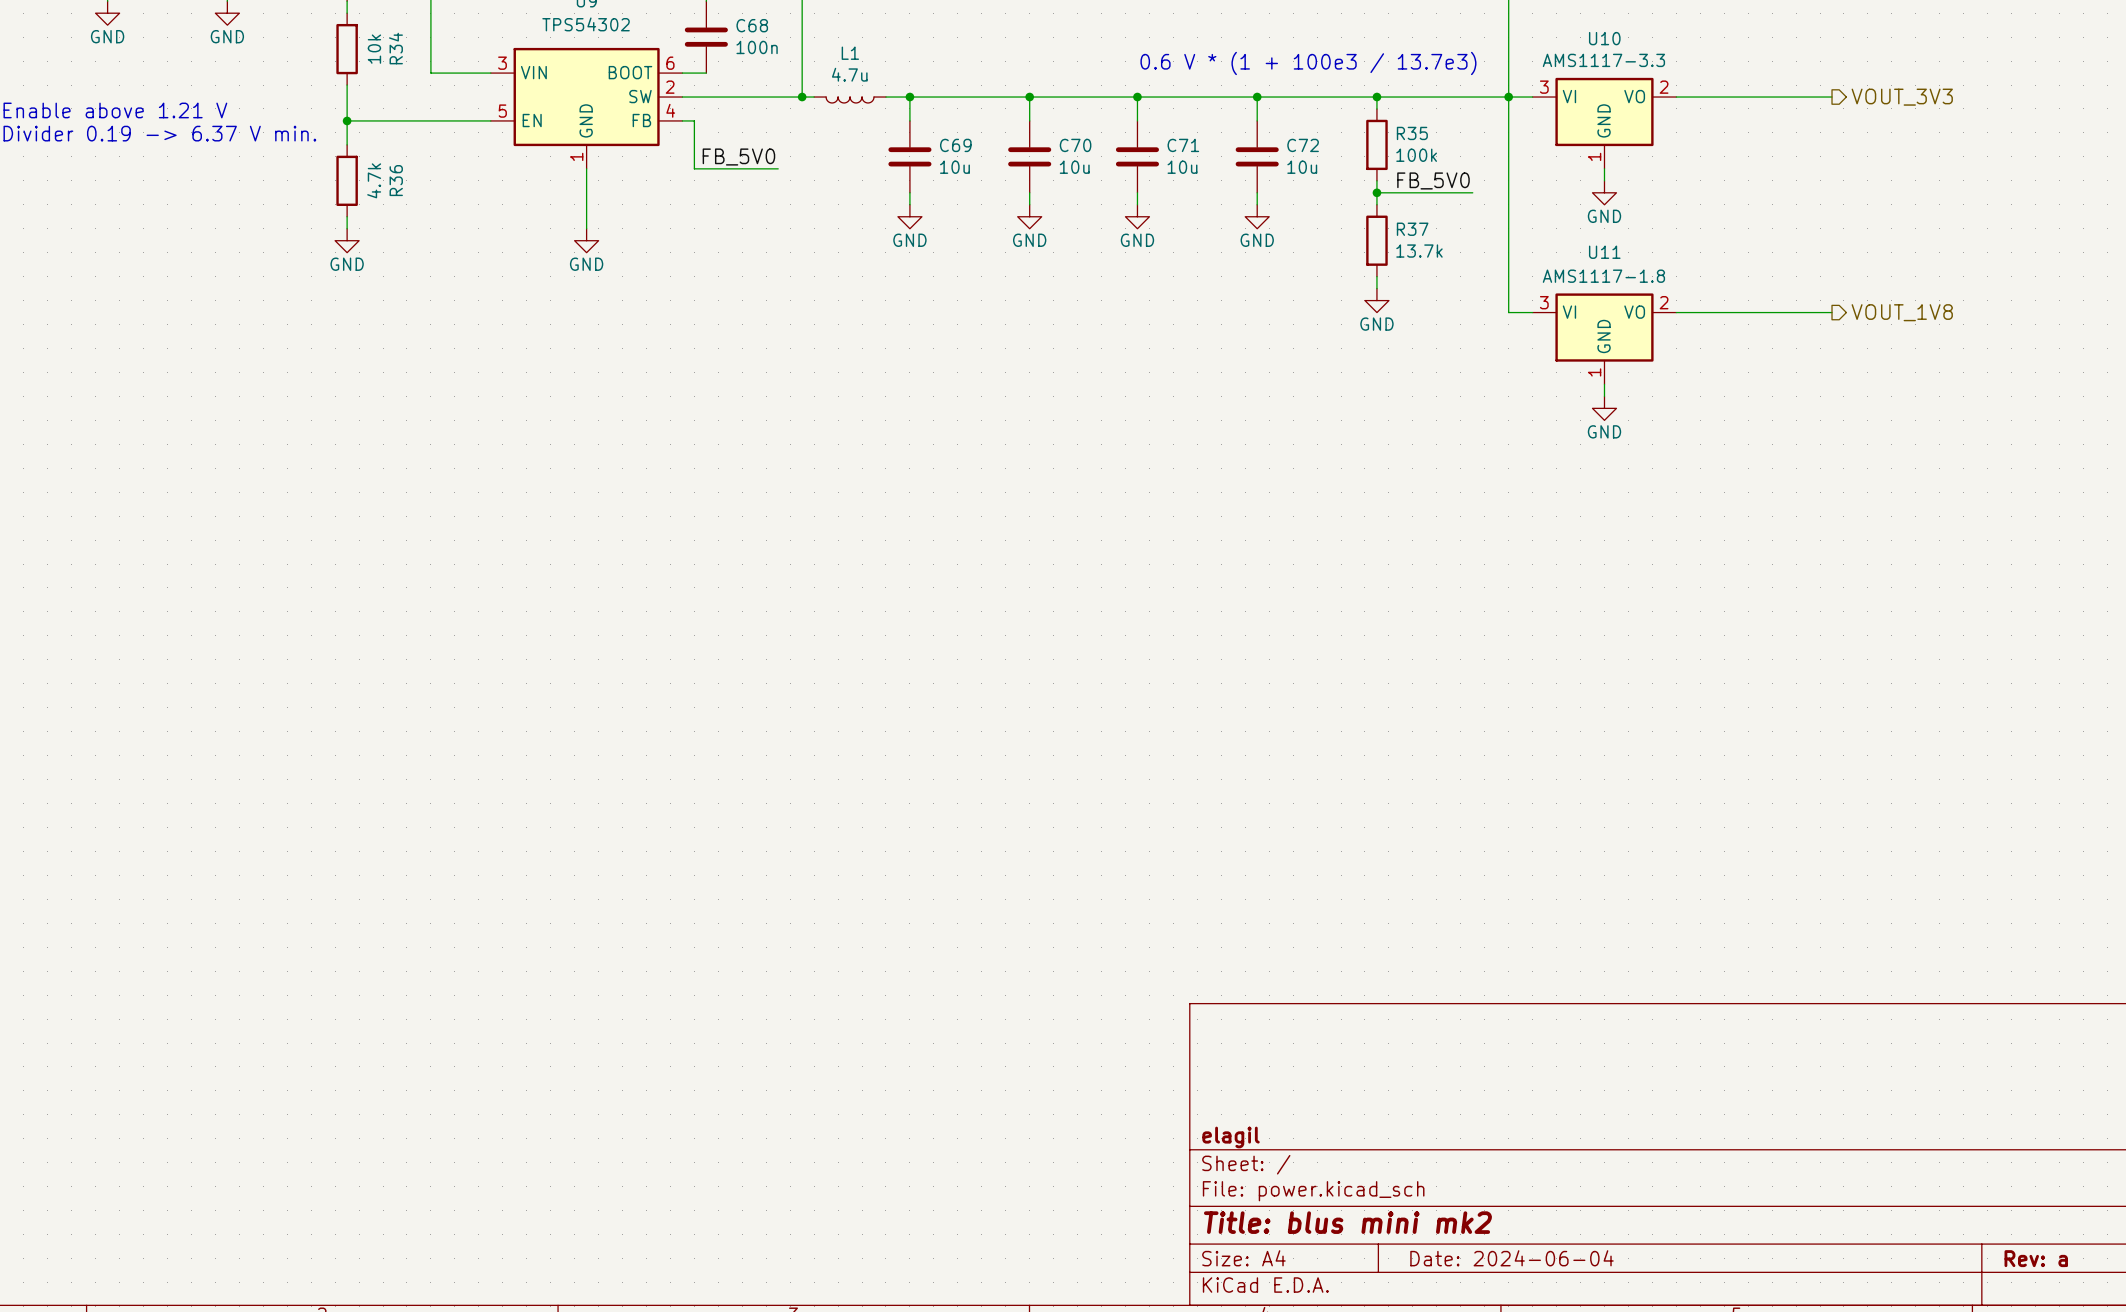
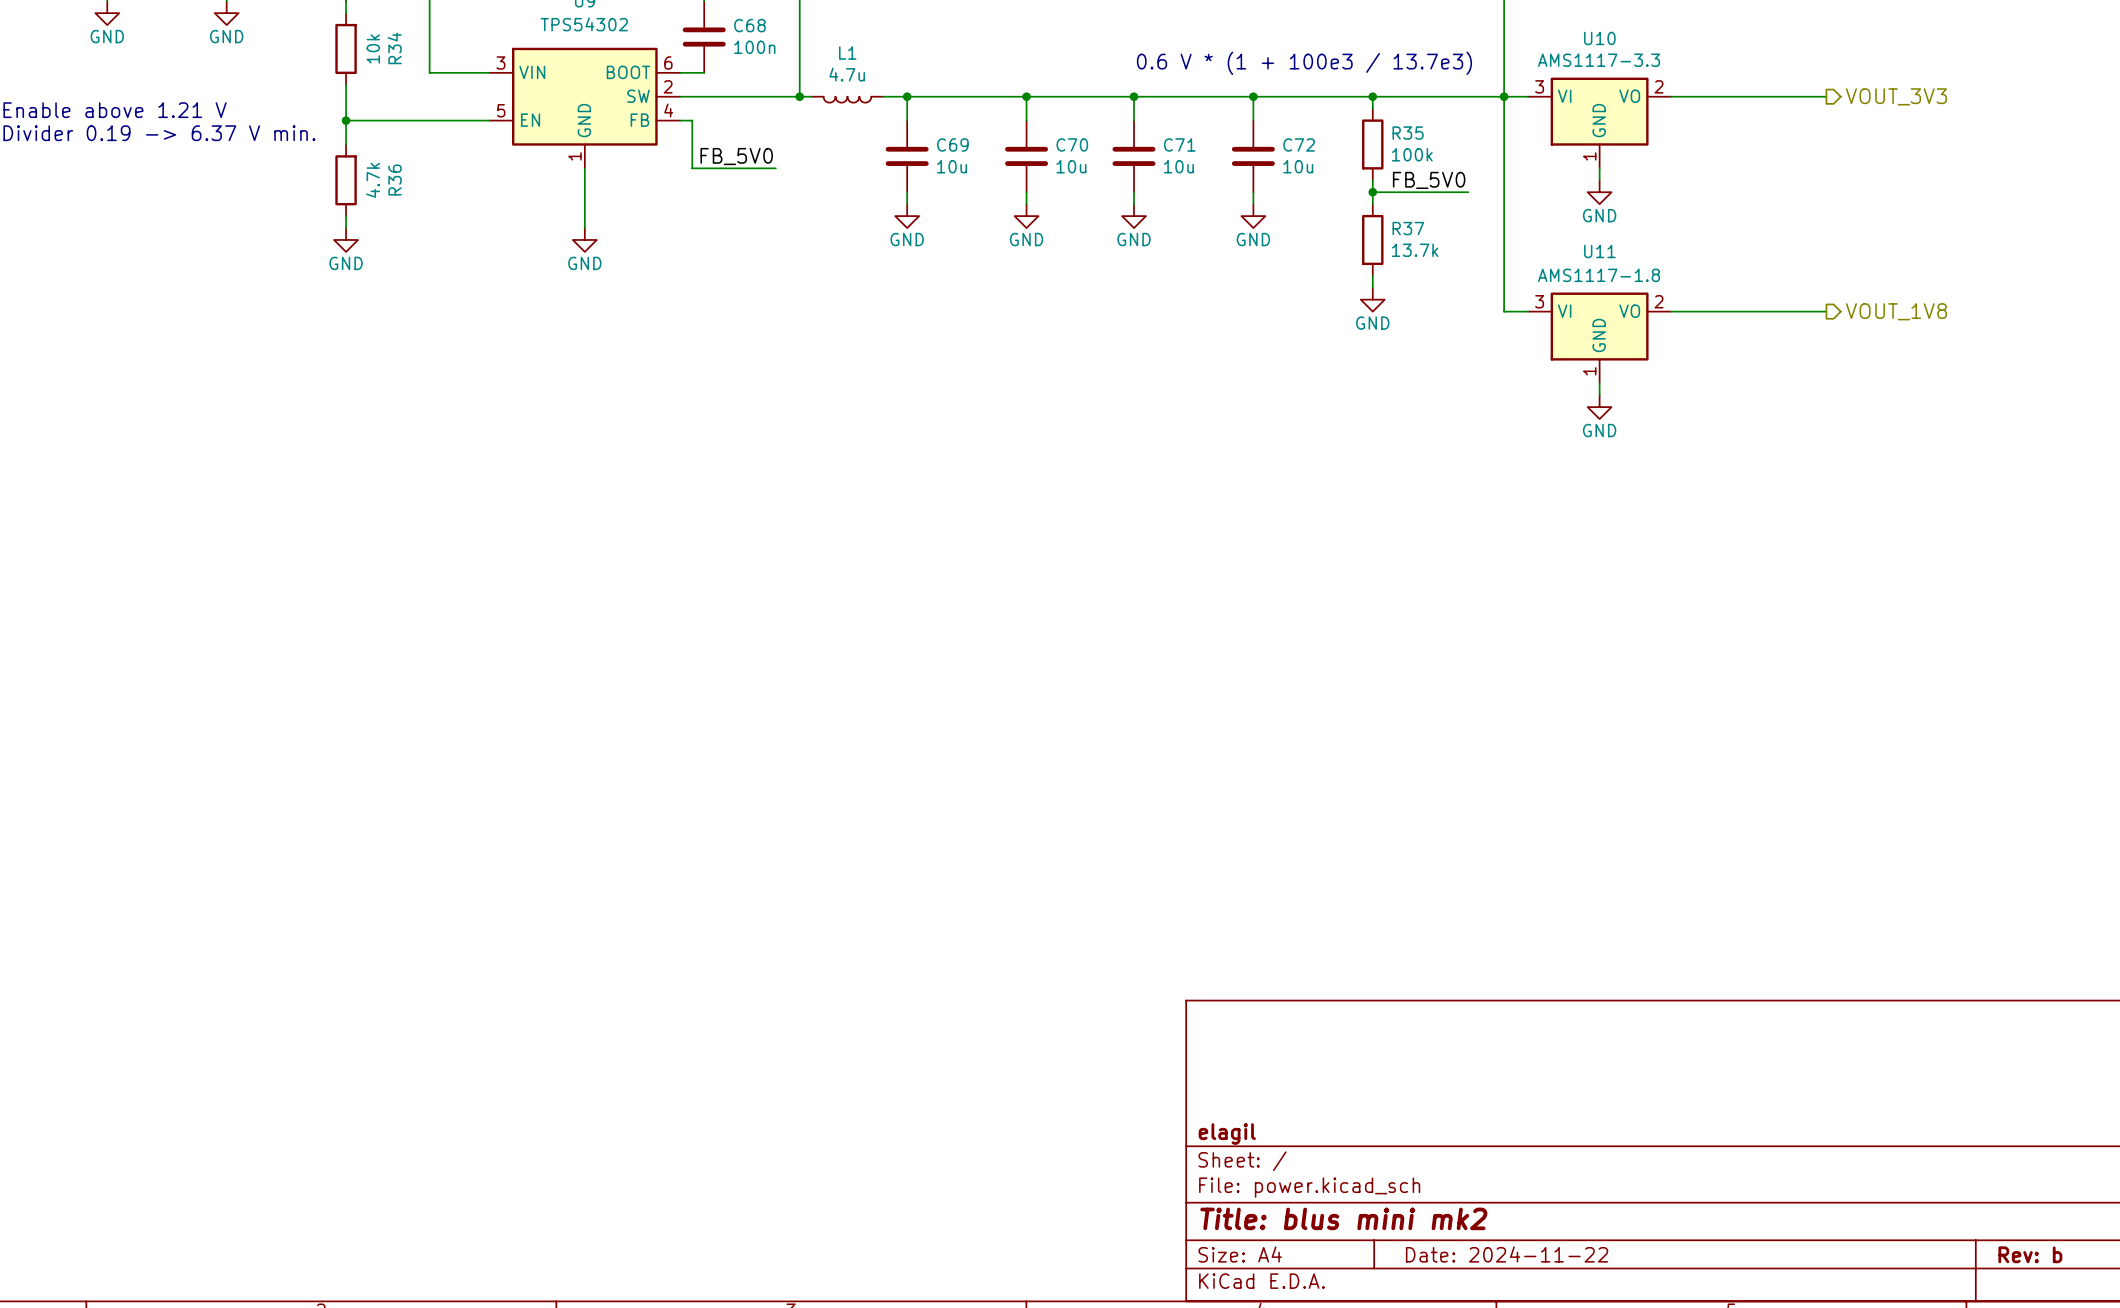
title block: Date: 2024-06-04 (1512, 1258) -> Date: 2024-11-22 (1507, 1254)
title block: Rev: a (2036, 1258) -> Rev: b (2030, 1254)

